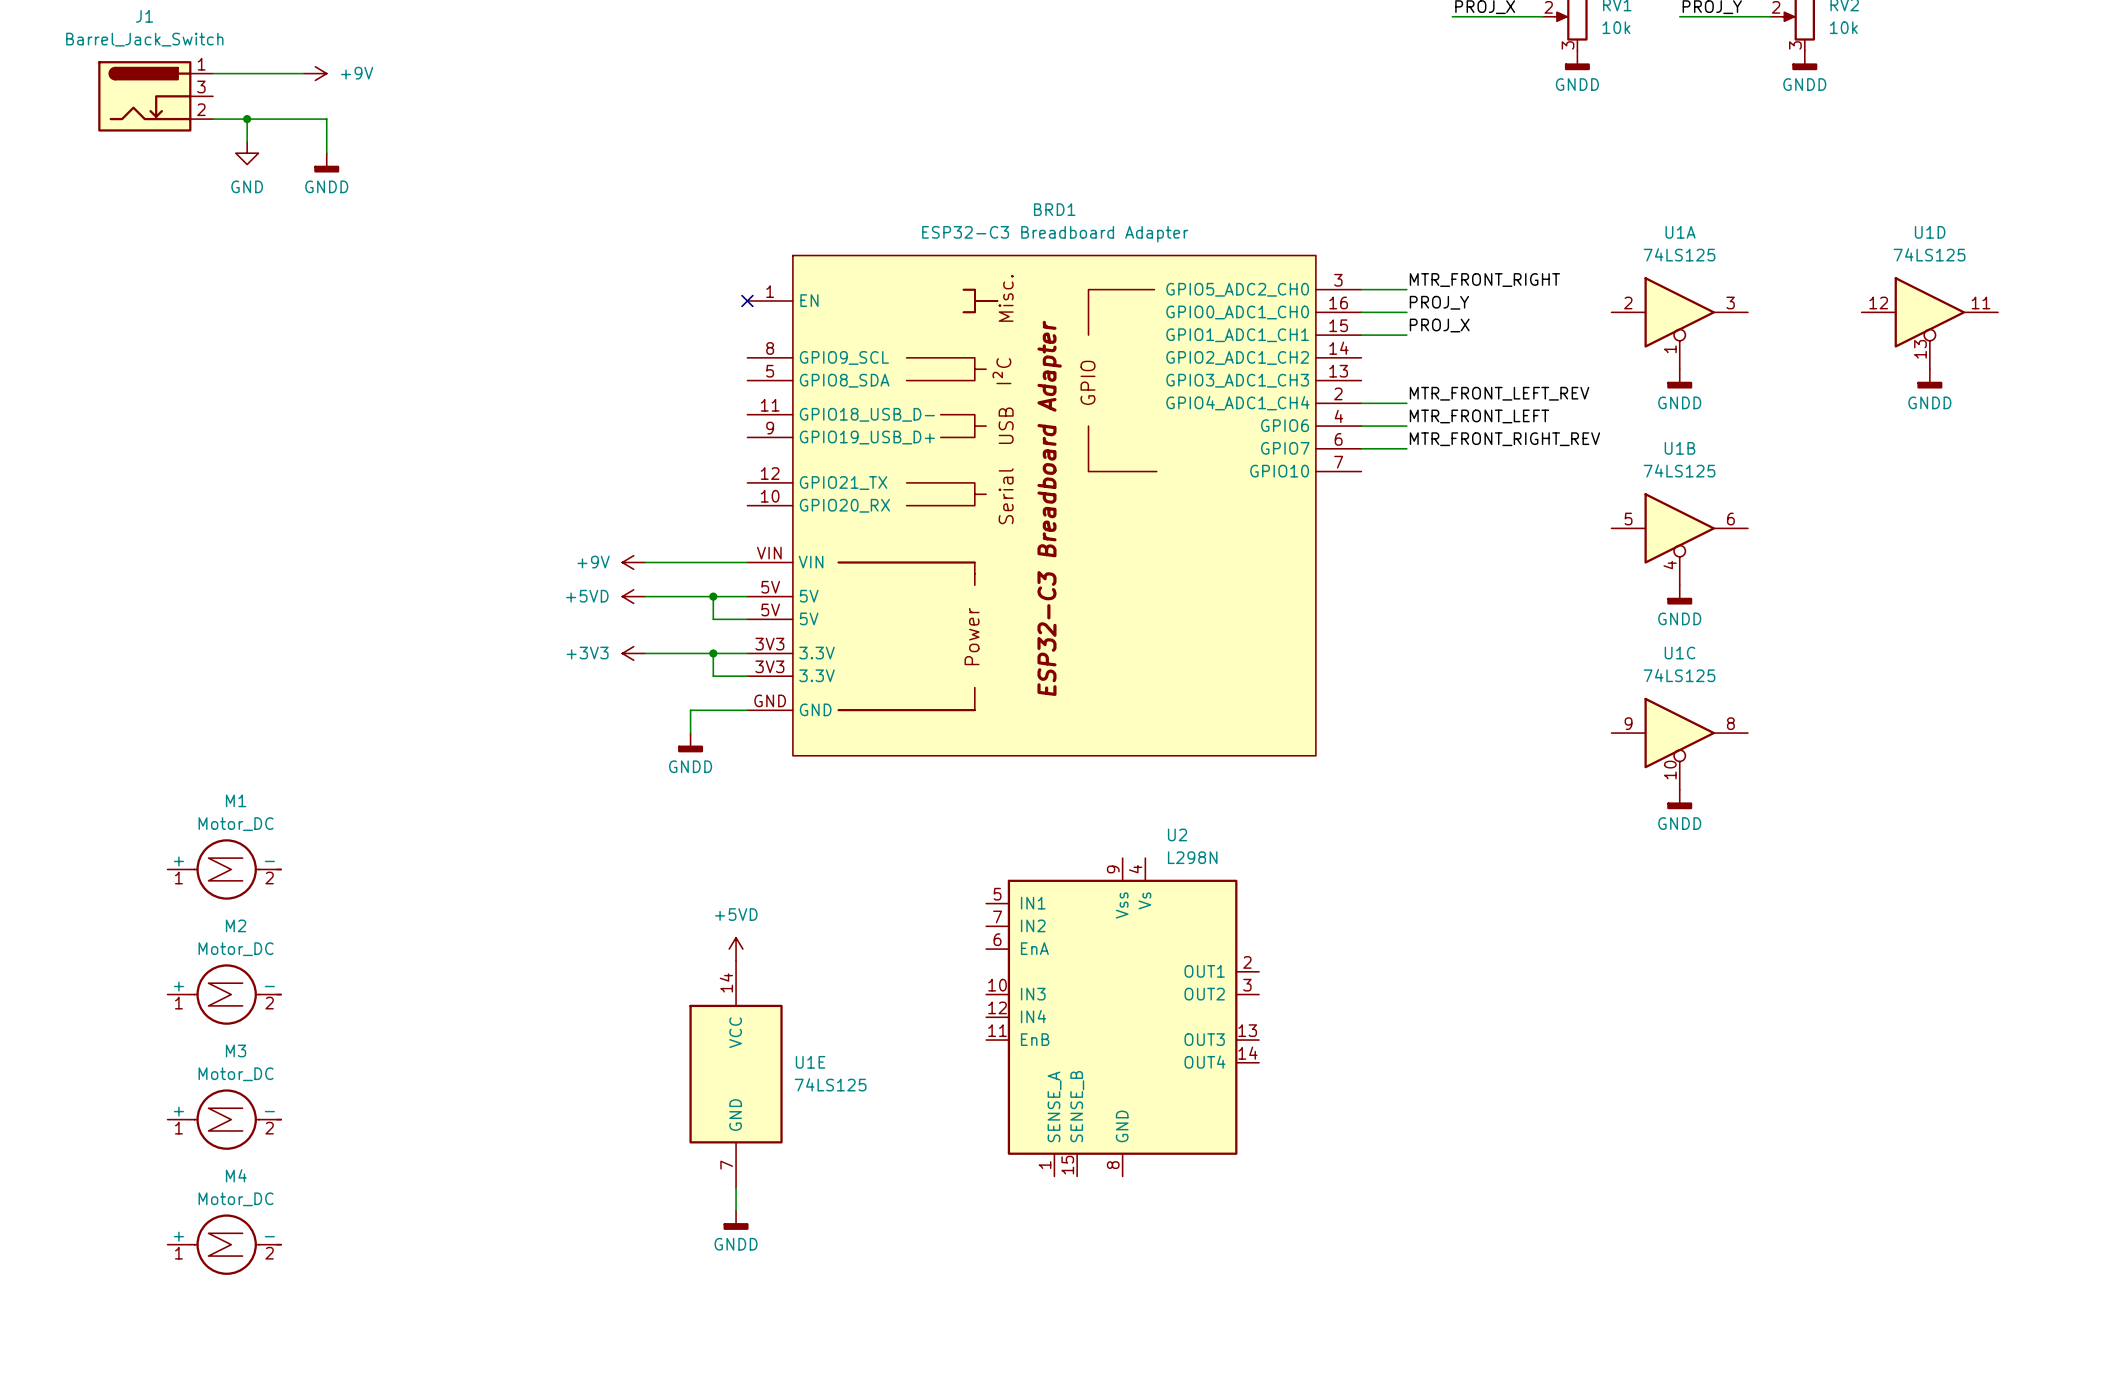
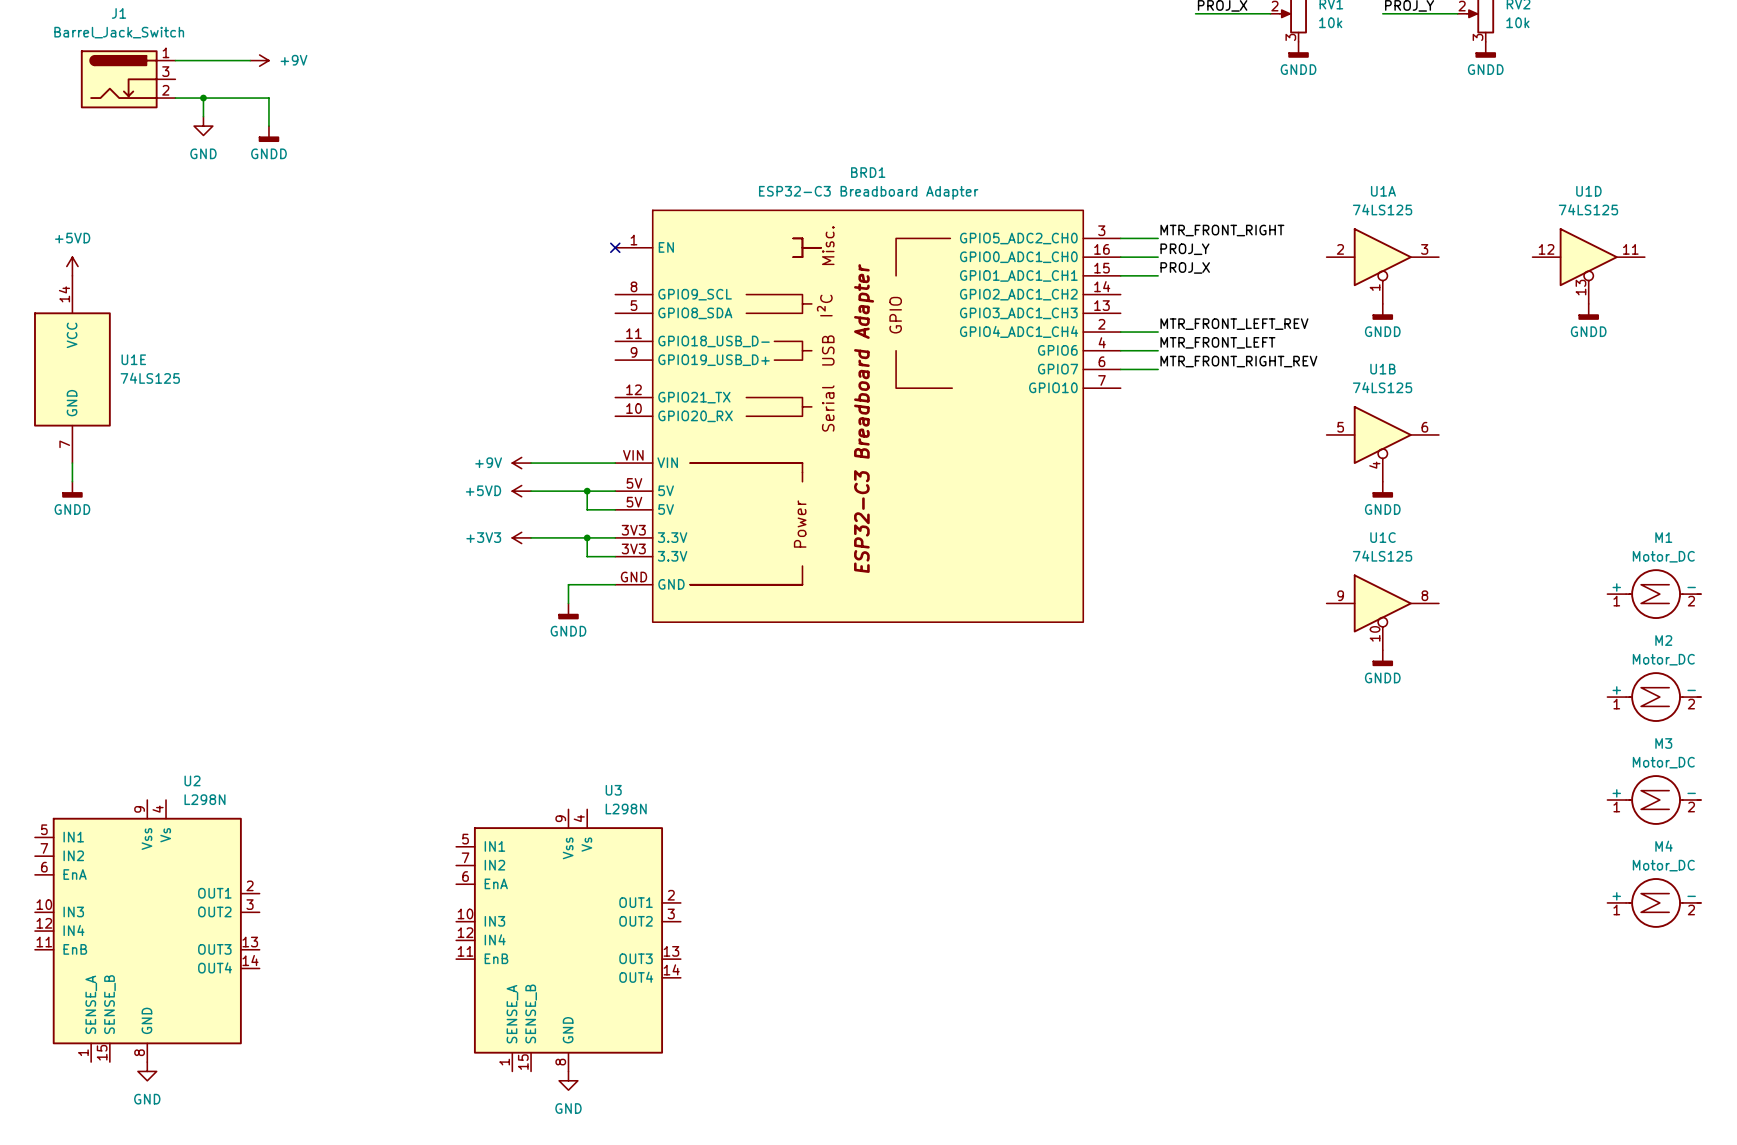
power symbol: none -> +5VD (72, 266)
wire: none -> (72, 463) (72, 481)
power symbol: none -> GNDD (72, 489)
M1 position: (224, 869) -> (1654, 594)
power symbol: +5VD (736, 949) -> none
M2 position: (224, 994) -> (1654, 697)
U2 position: (1122, 1017) -> (147, 931)
U1E position: (736, 1074) -> (72, 369)
M3 position: (224, 1119) -> (1654, 800)
U3: none -> L298N (568, 940)
power symbol: GNDD (736, 1220) -> none
M4 position: (224, 1244) -> (1654, 902)
power symbol: none -> GND (147, 1071)
power symbol: none -> GND (568, 1080)

